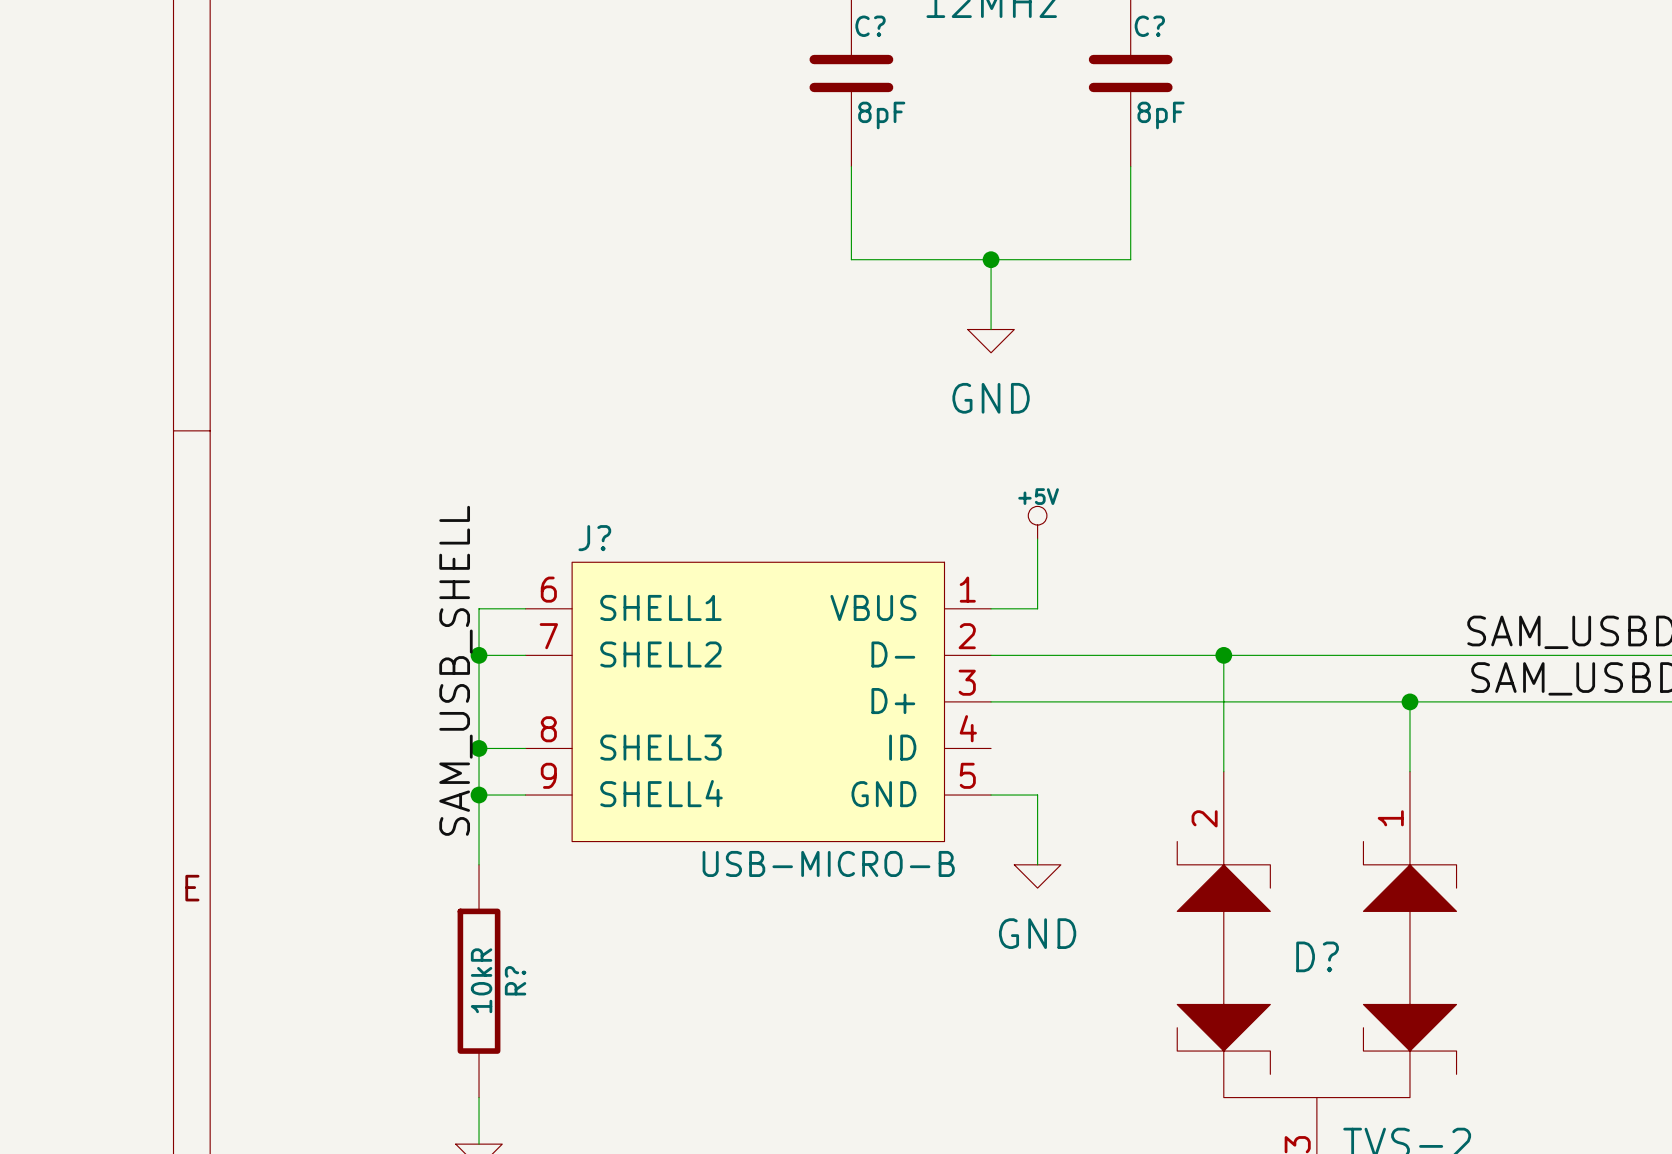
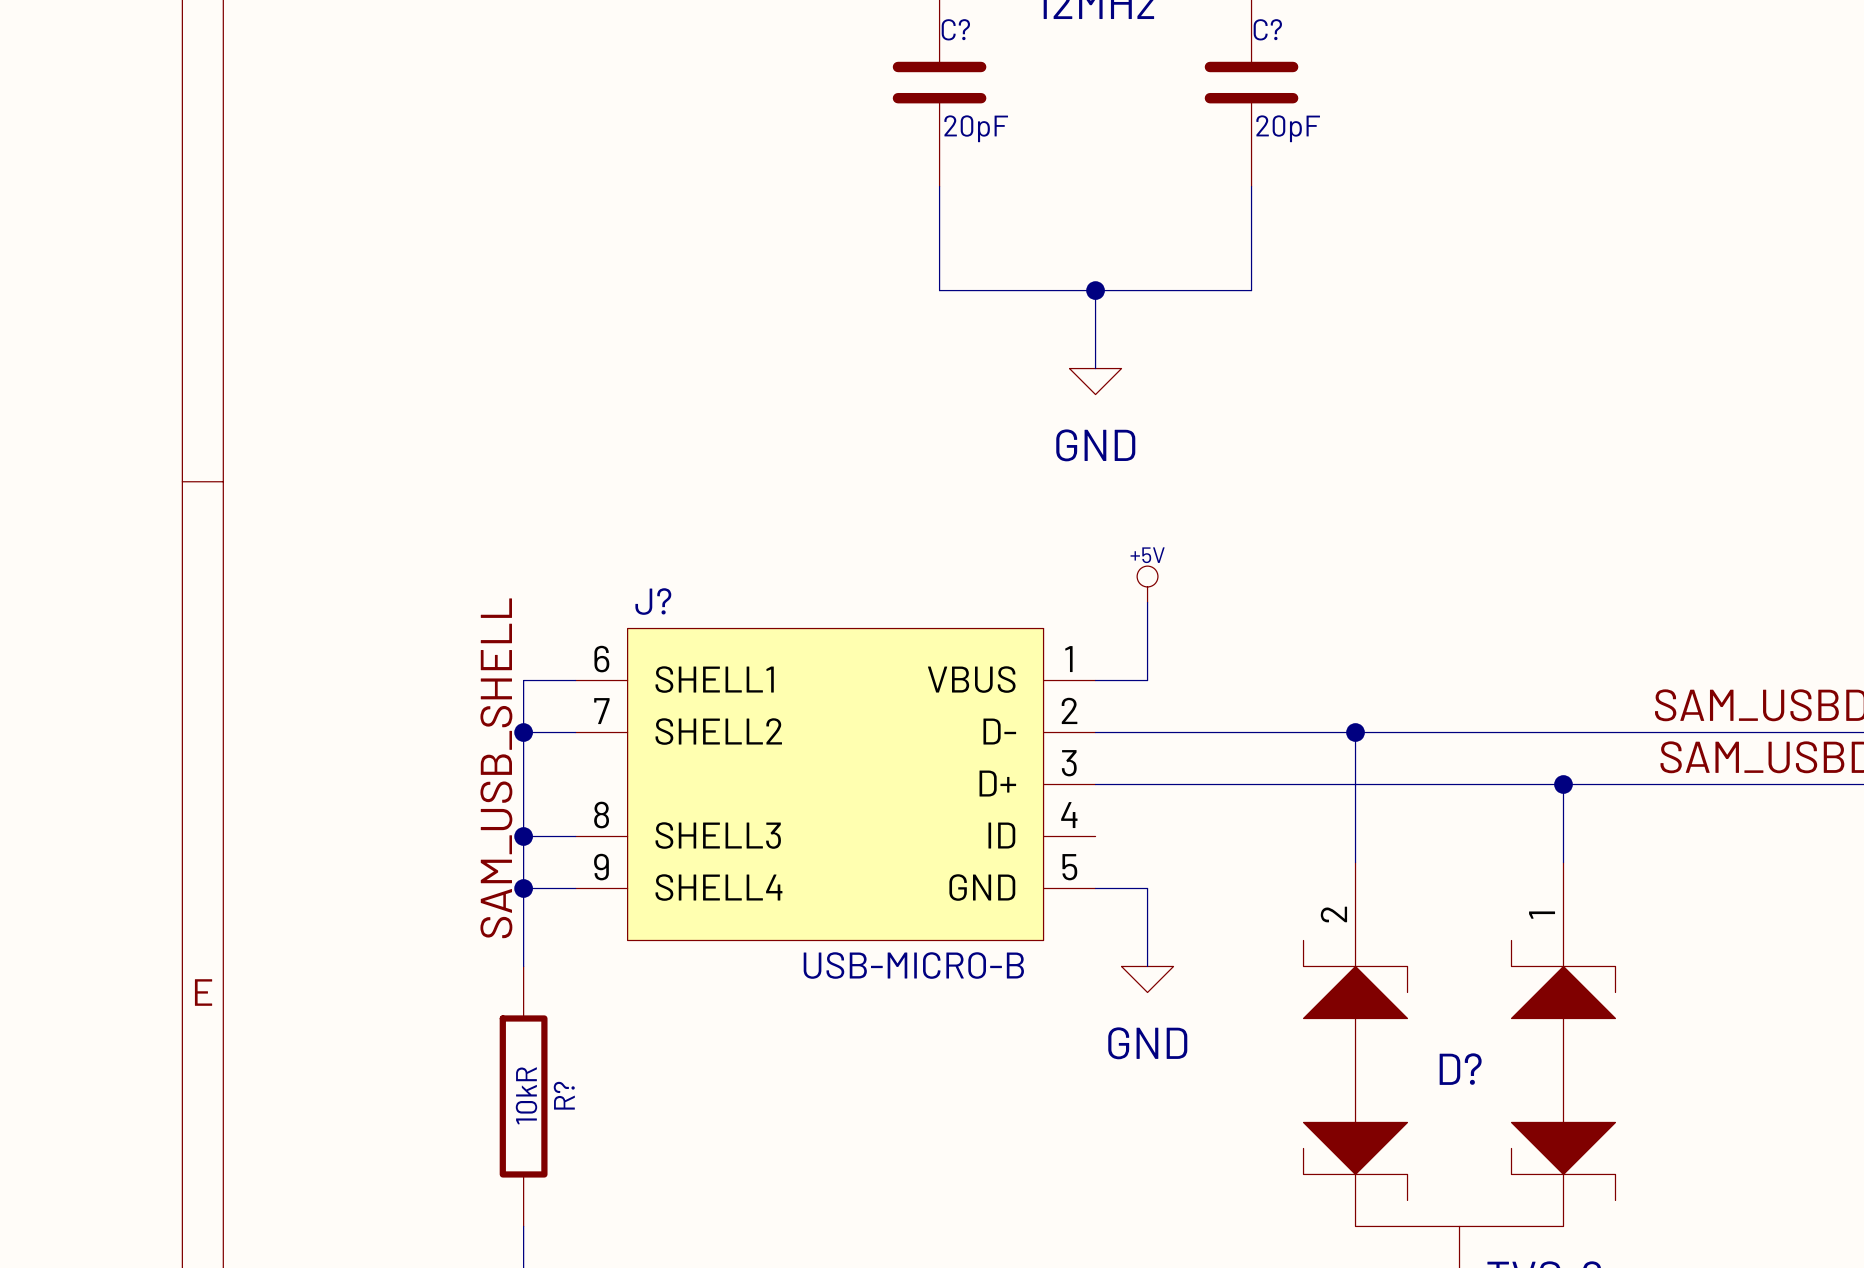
C? value: 8pF (881, 115) -> 20pF (976, 128)
C? value: 8pF (1161, 115) -> 20pF (1288, 128)

